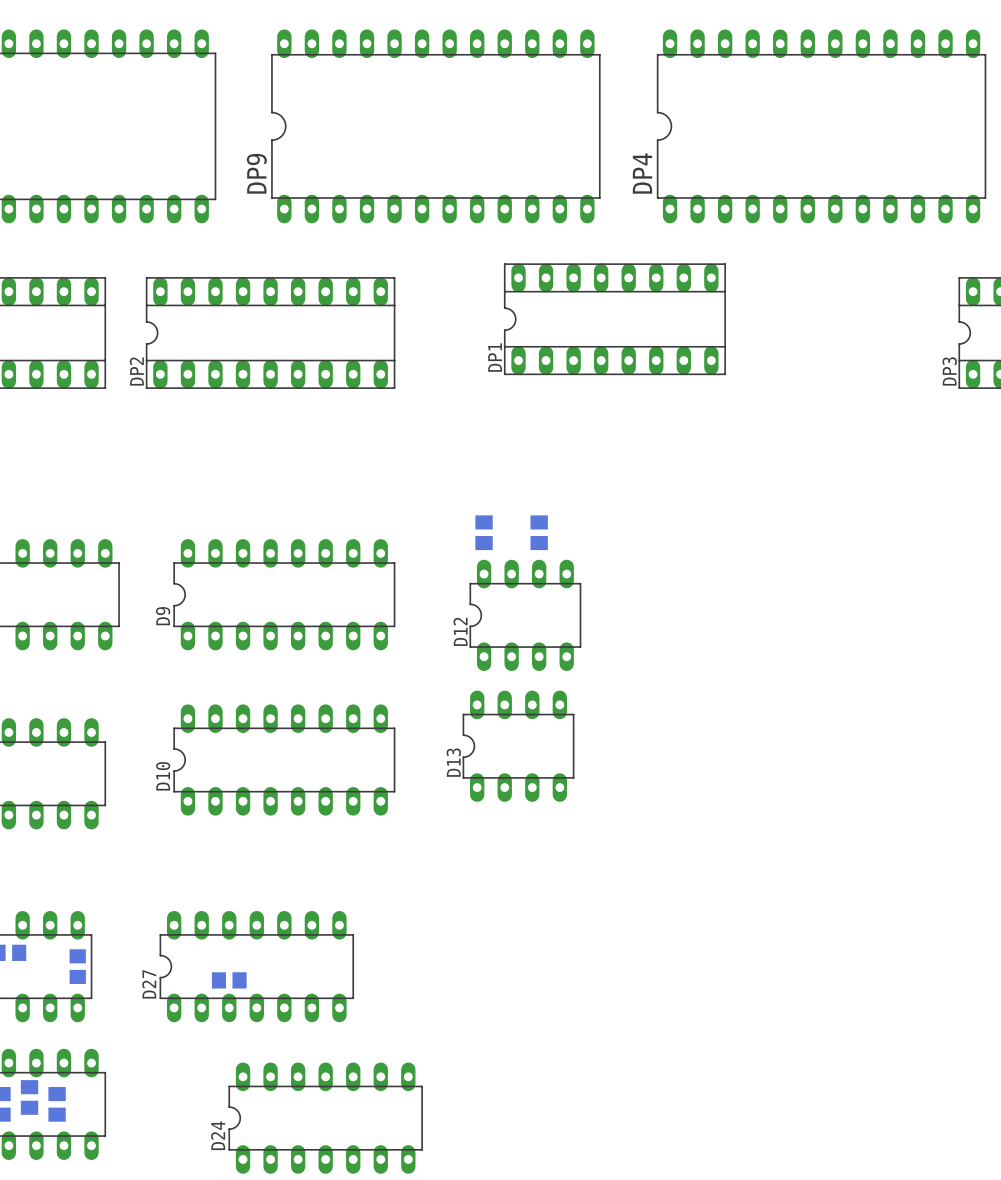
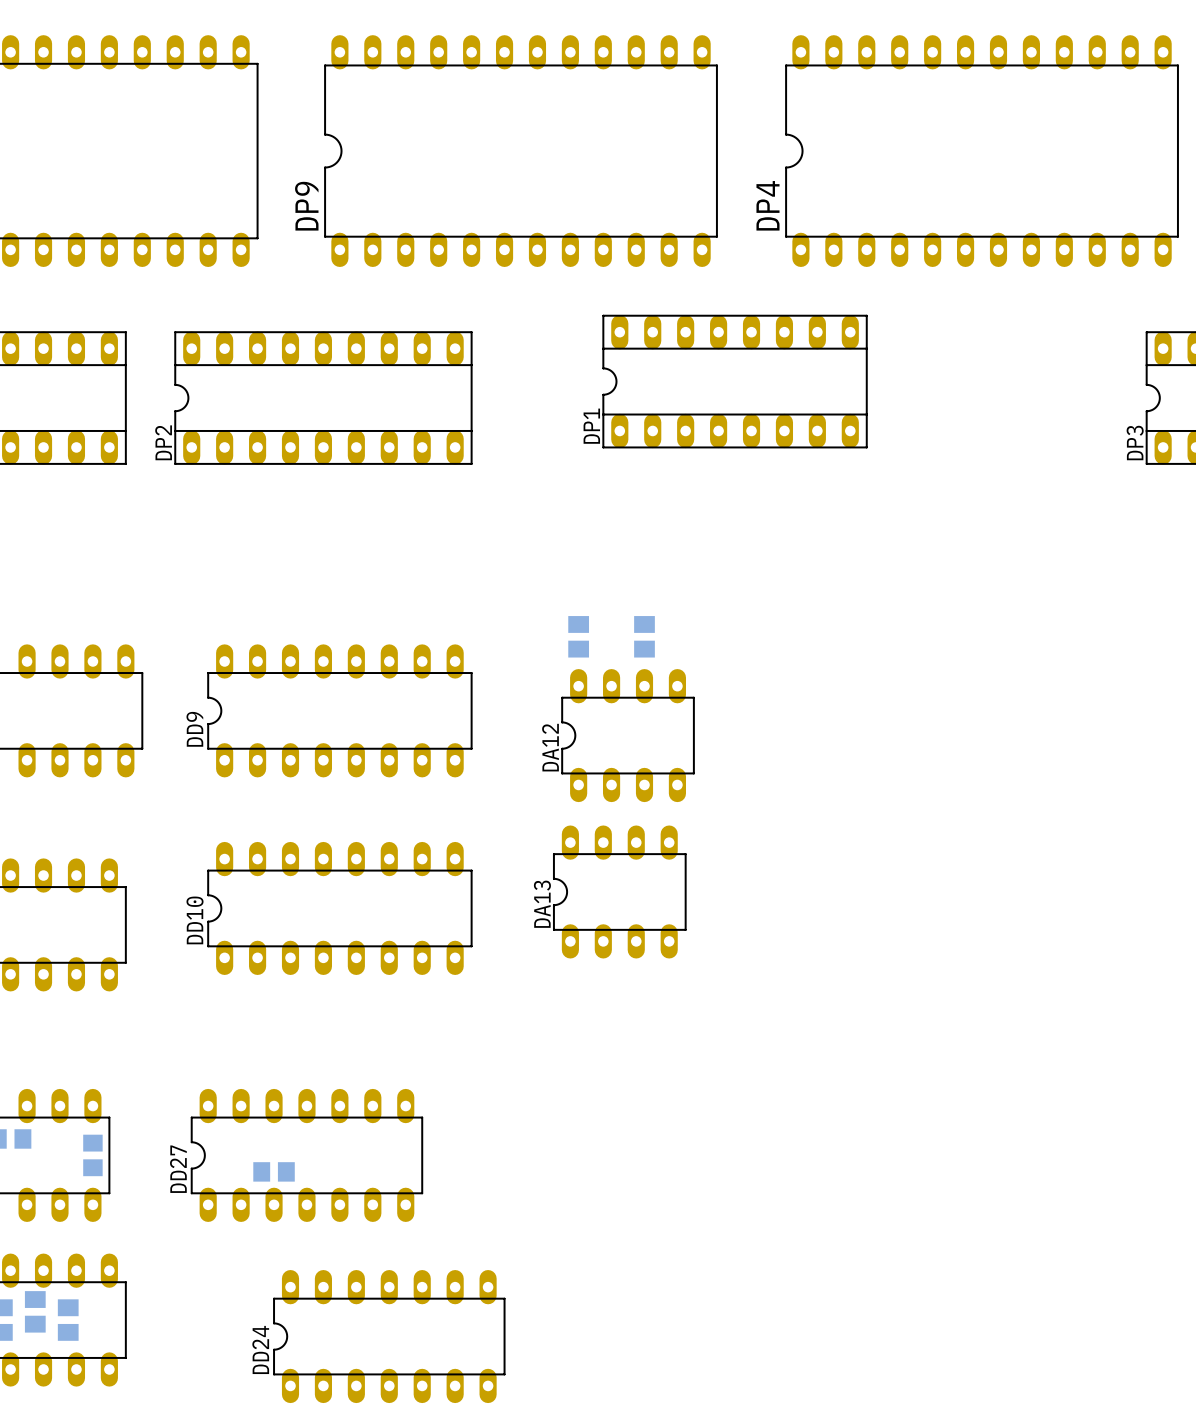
D9 name: D9 (163, 616) -> DD9 (194, 729)
D12 name: D12 (460, 631) -> DA12 (550, 747)
D13 name: D13 (453, 762) -> DA13 (542, 904)
D10 name: D10 (163, 776) -> DD10 (195, 920)
D27 name: D27 (149, 984) -> DD27 (178, 1169)
D24 name: D24 (218, 1135) -> DD24 (260, 1349)

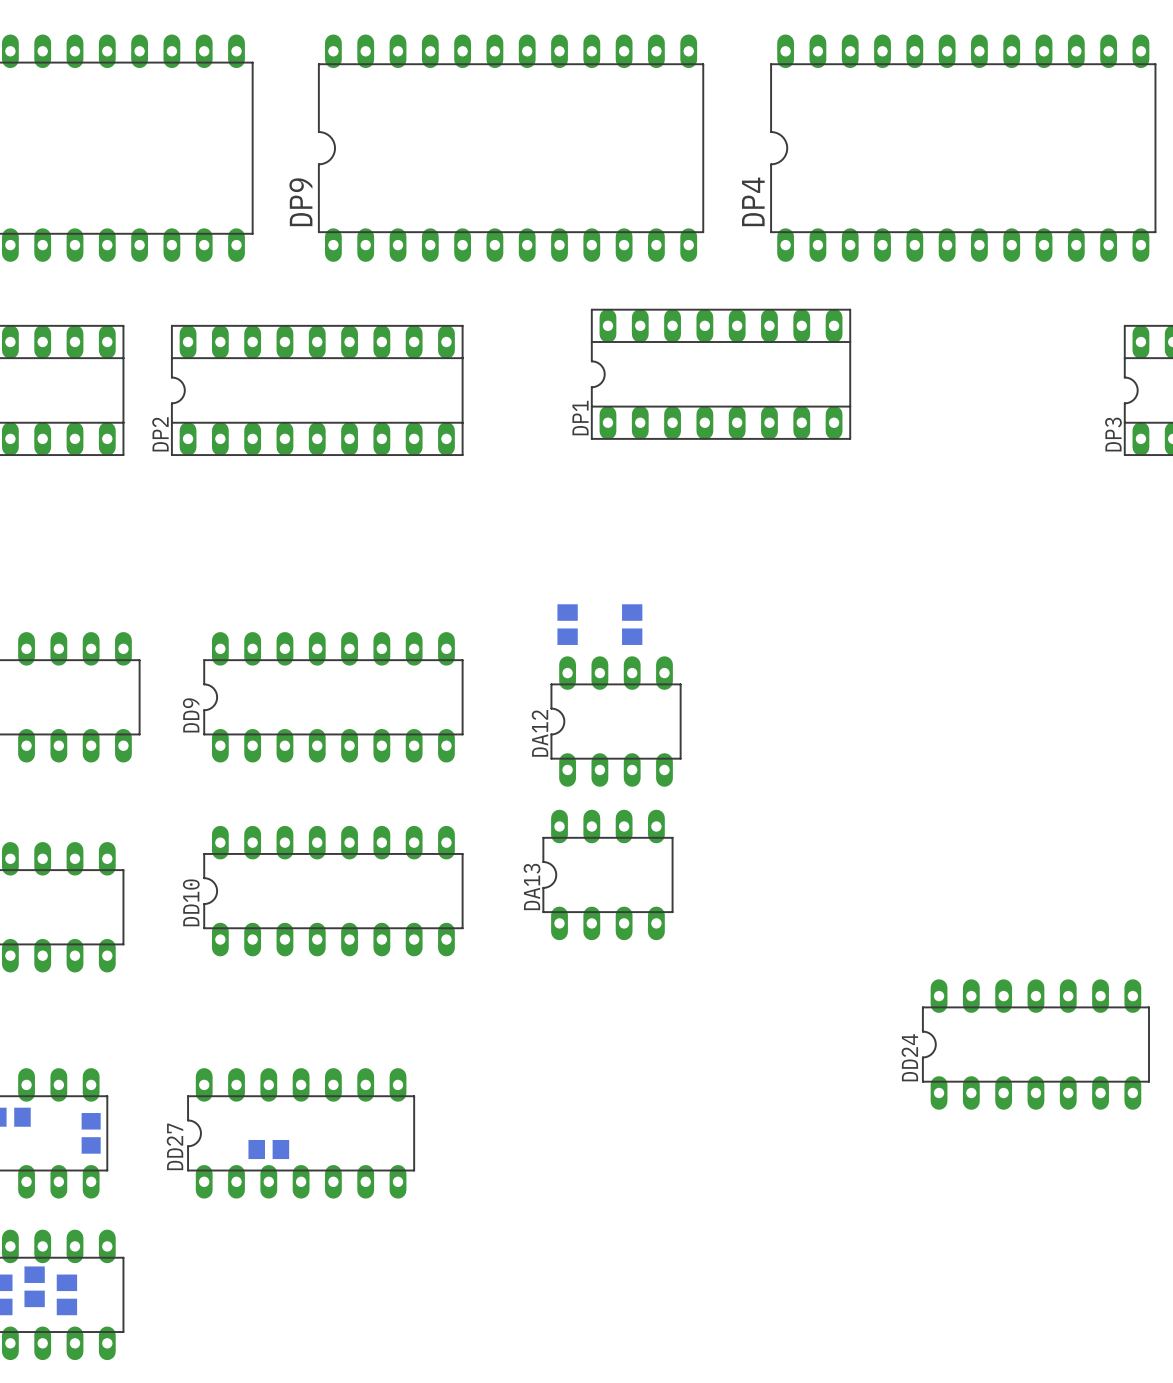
DD24 position: (389, 1336) -> (1035, 1044)

